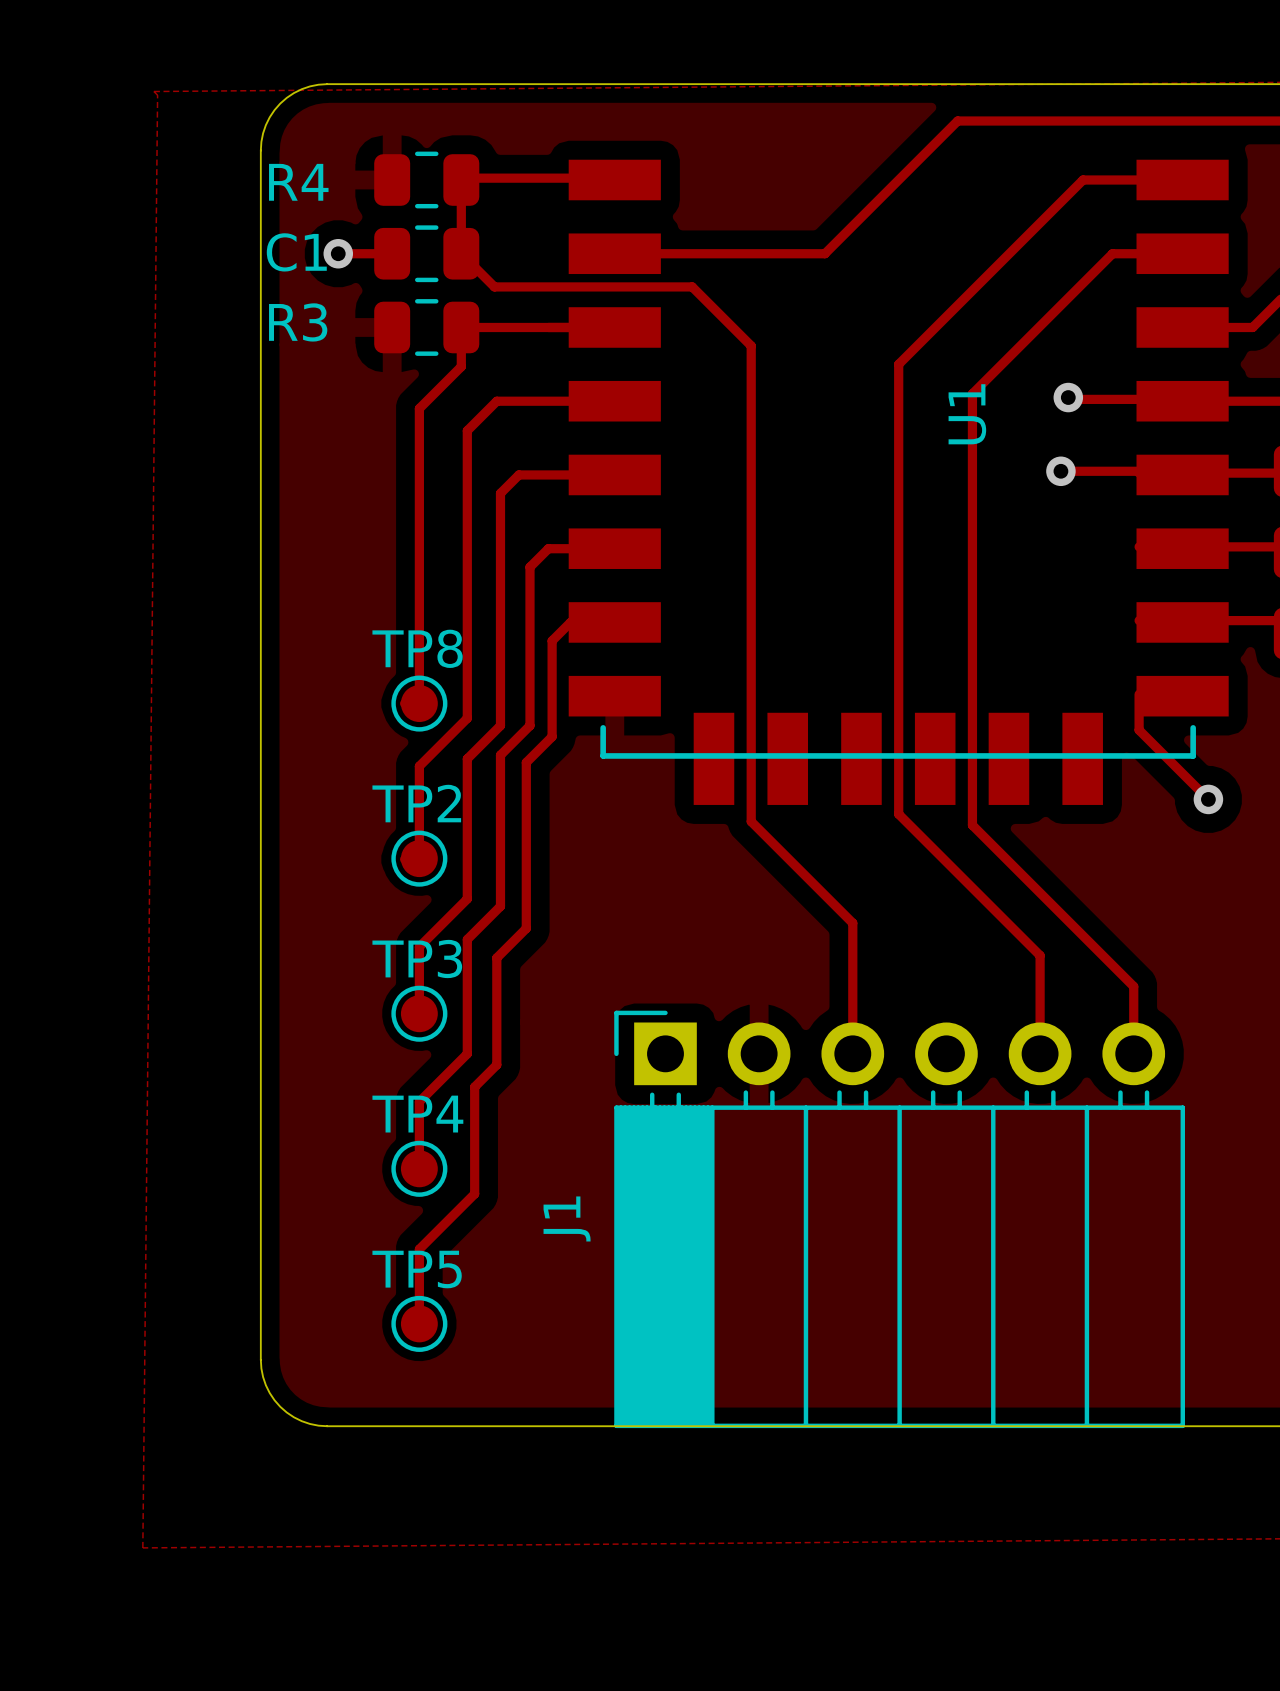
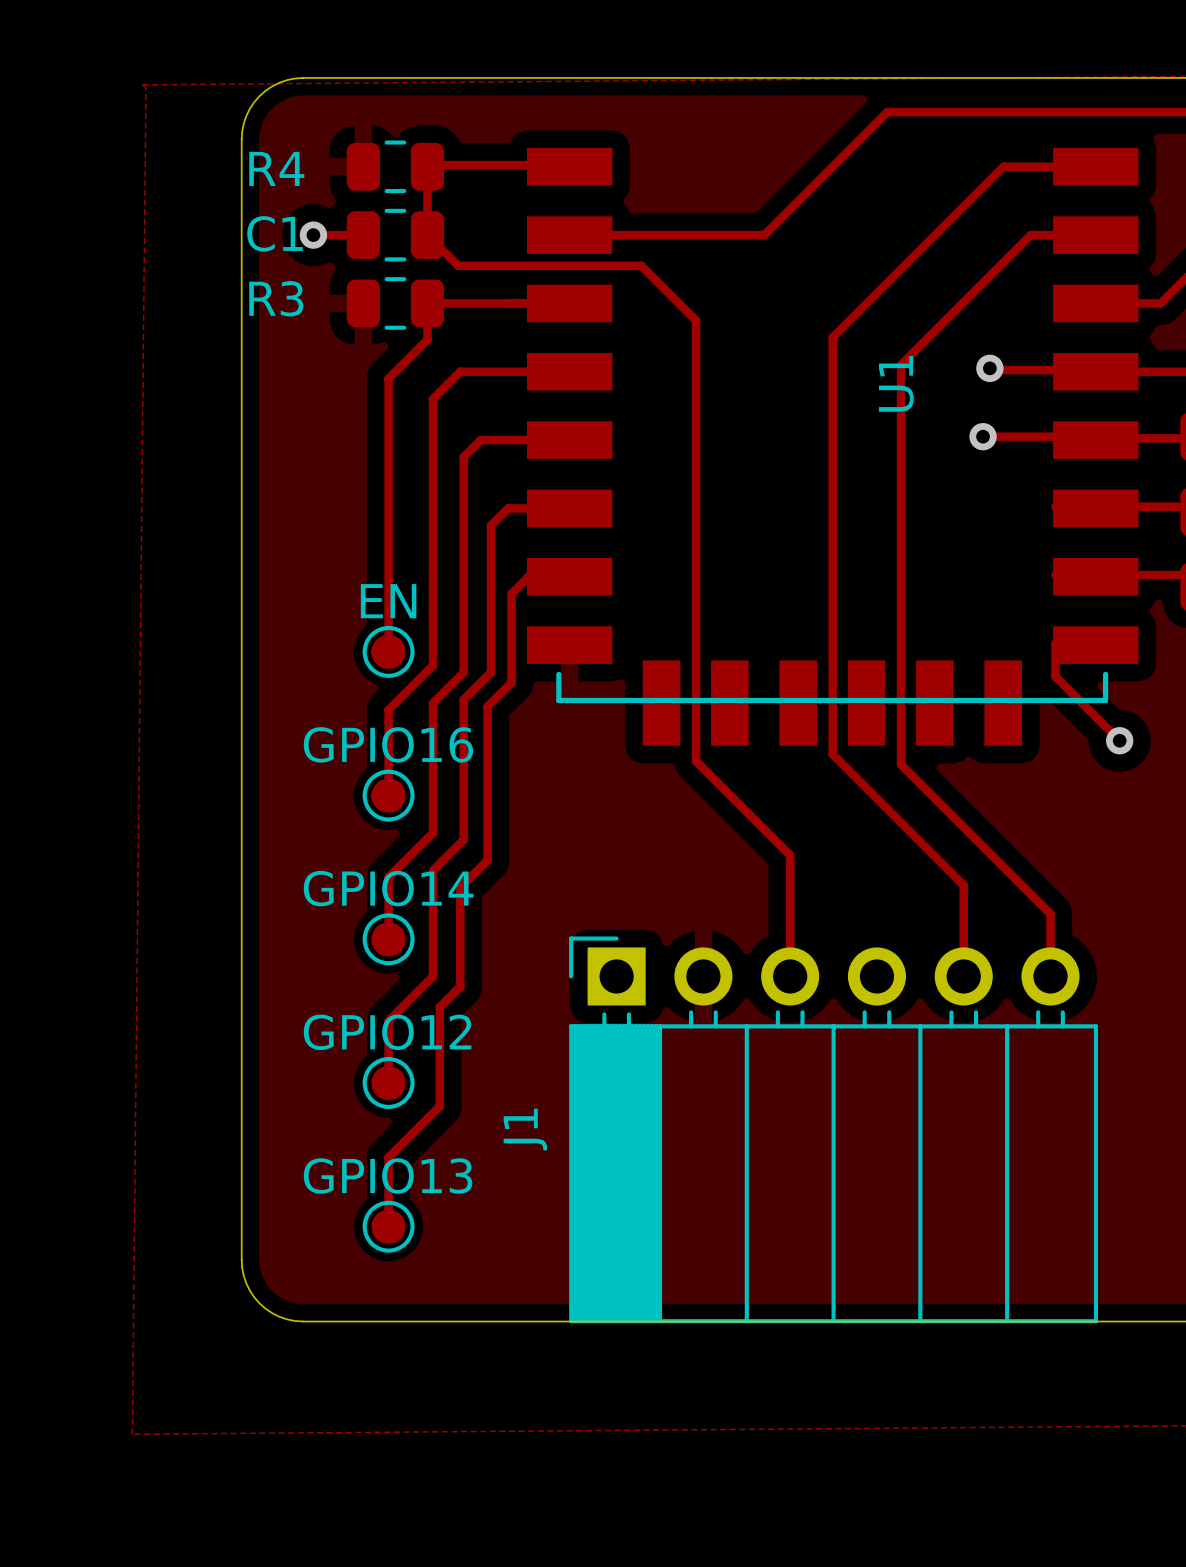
TP8 name: TP8 (417, 648) -> EN (388, 601)
TP2 name: TP2 (416, 803) -> GPIO16 (388, 744)
TP3 name: TP3 (417, 959) -> GPIO14 (388, 888)
TP4 name: TP4 (417, 1114) -> GPIO12 (387, 1032)
TP5 name: TP5 (417, 1269) -> GPIO13 (388, 1176)

